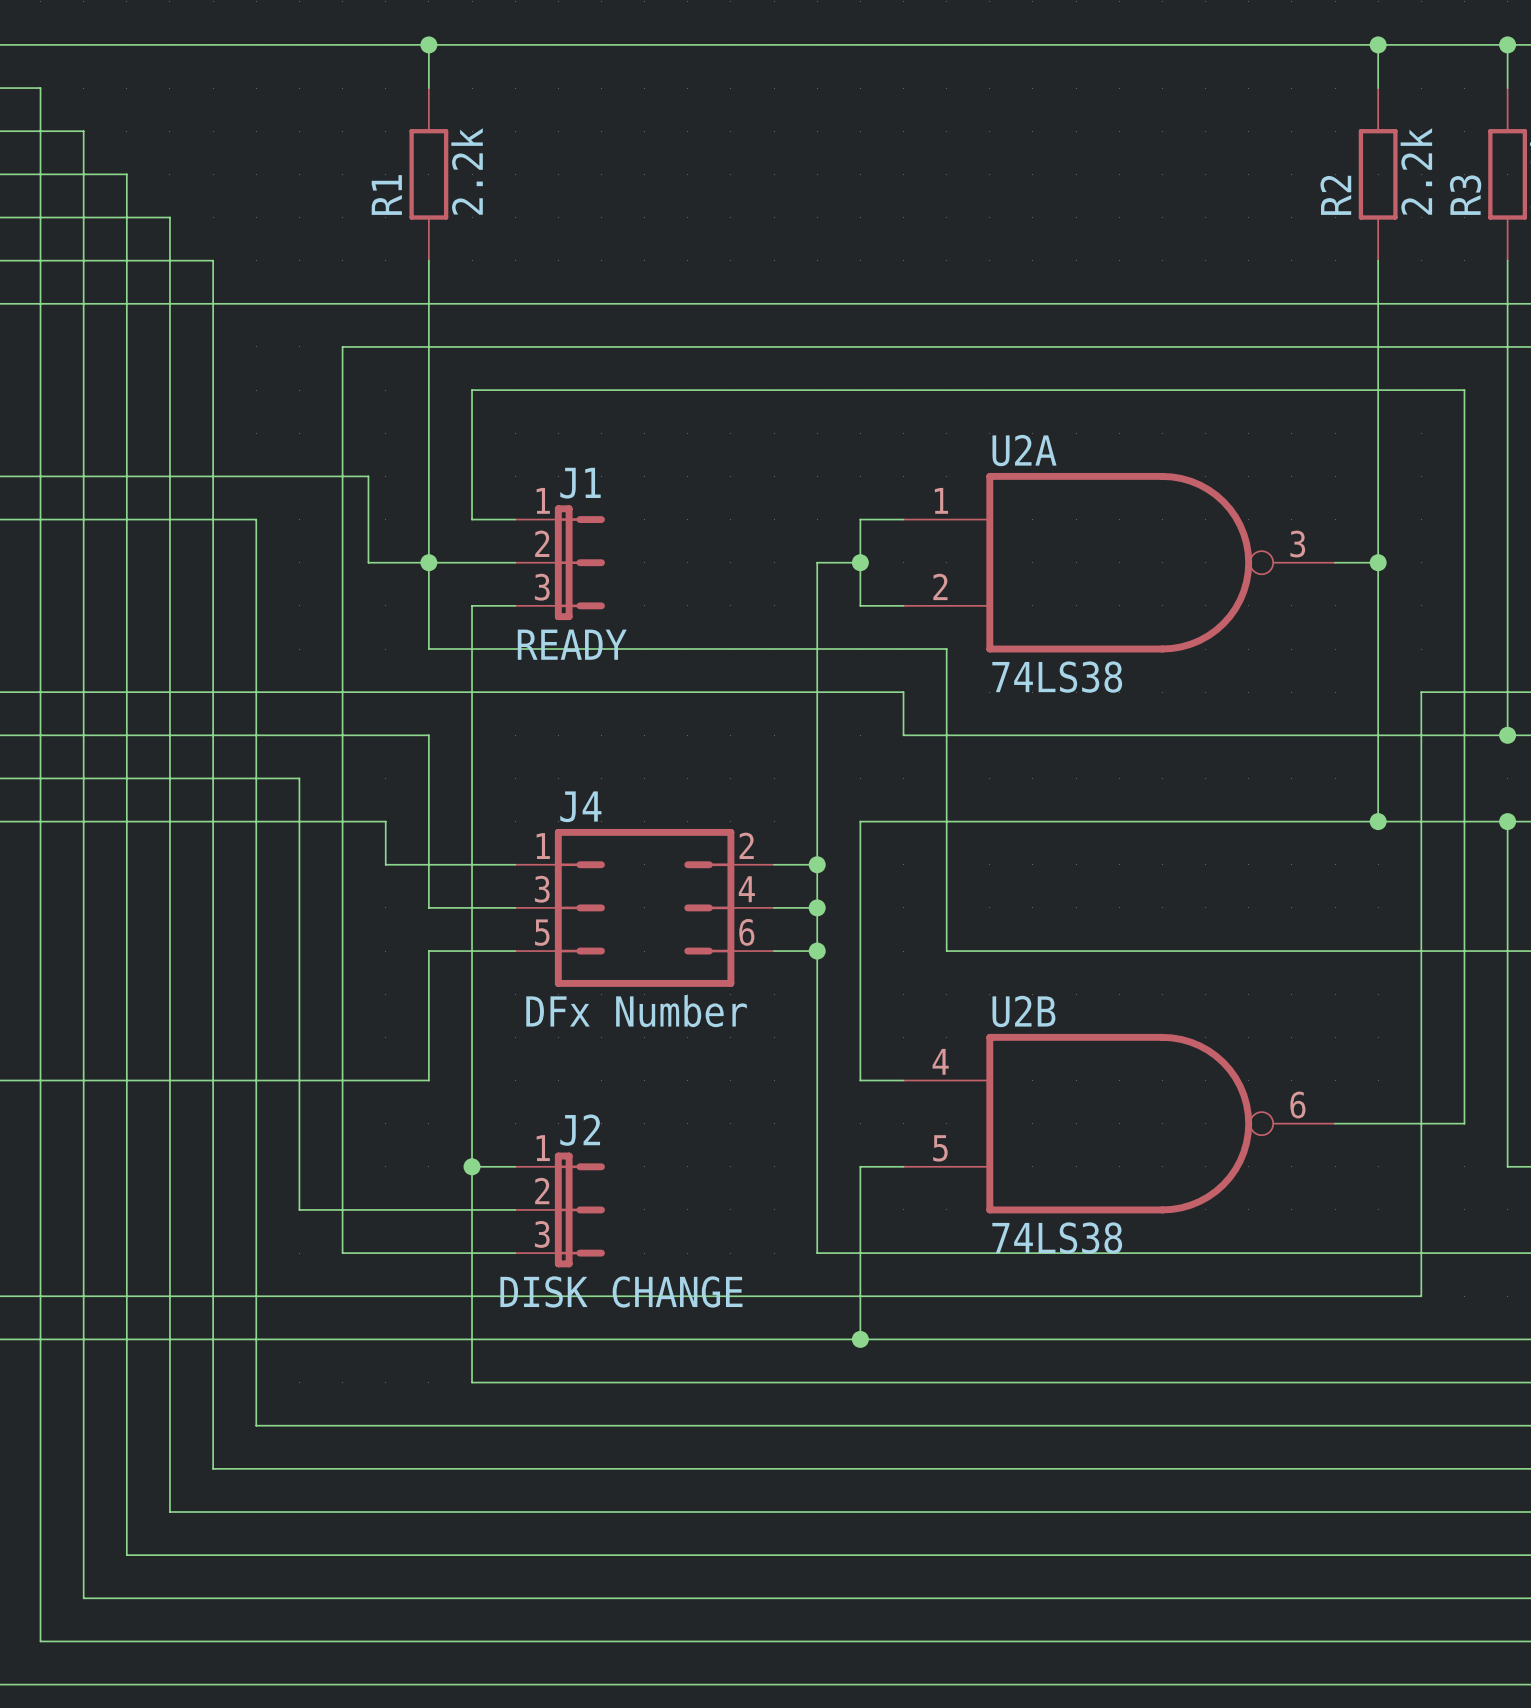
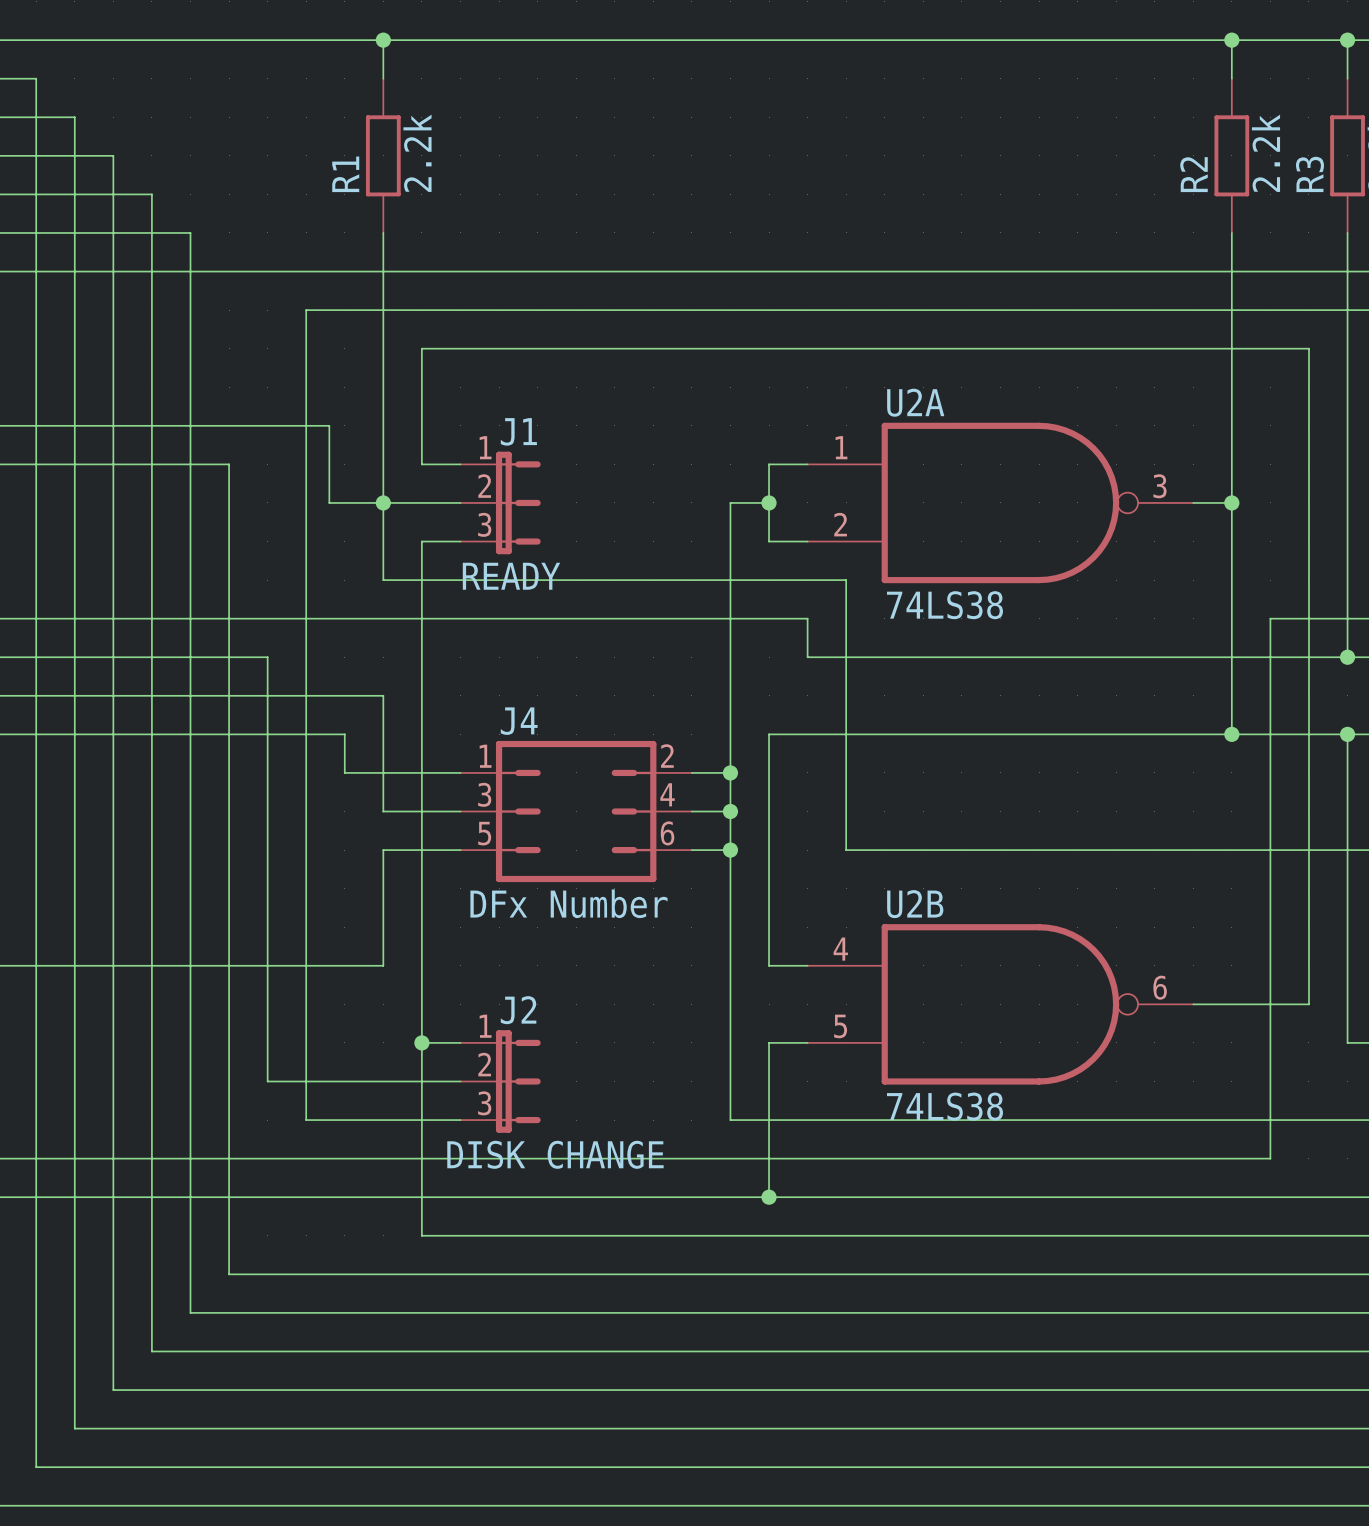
wire: (299, 735) (428, 735) (428, 778) -> (267, 657) (267, 695) (383, 695)

